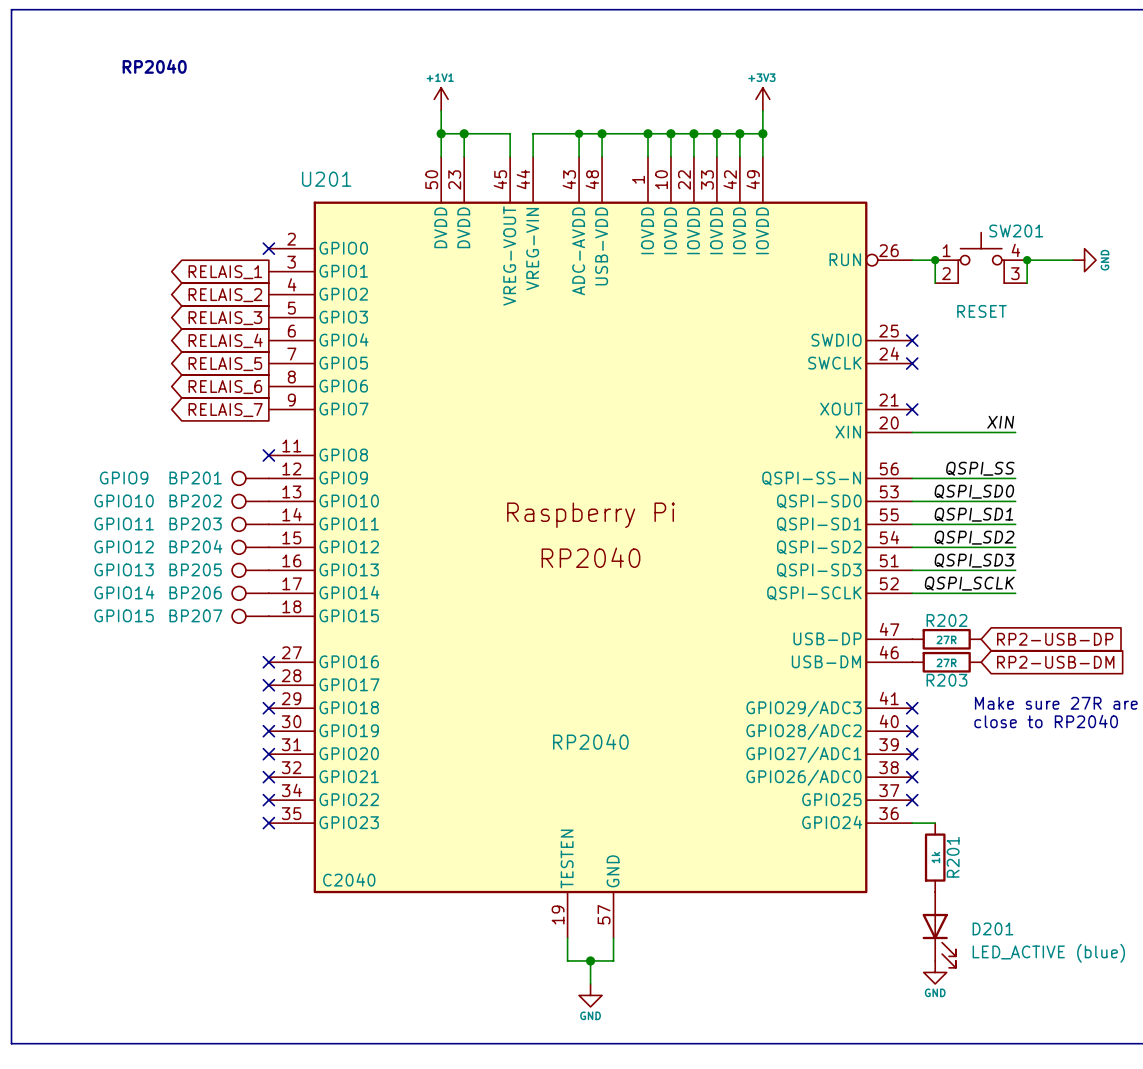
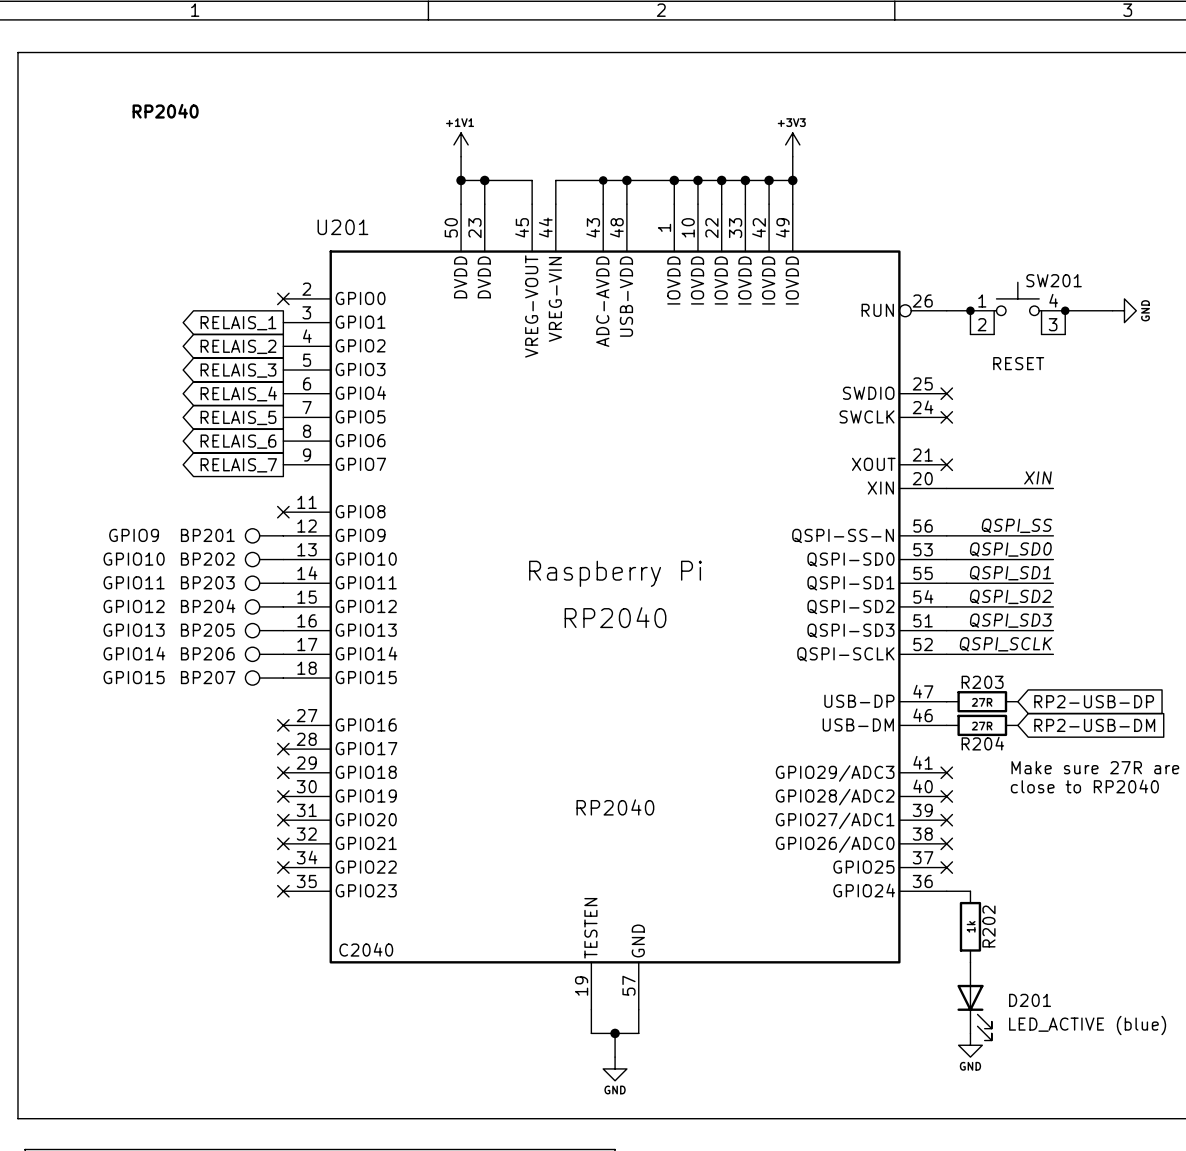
R202 name: R202 (946, 620) -> R203 (982, 682)
R203 name: R203 (946, 680) -> R204 (982, 743)
R201 name: R201 (953, 857) -> R202 (988, 926)

